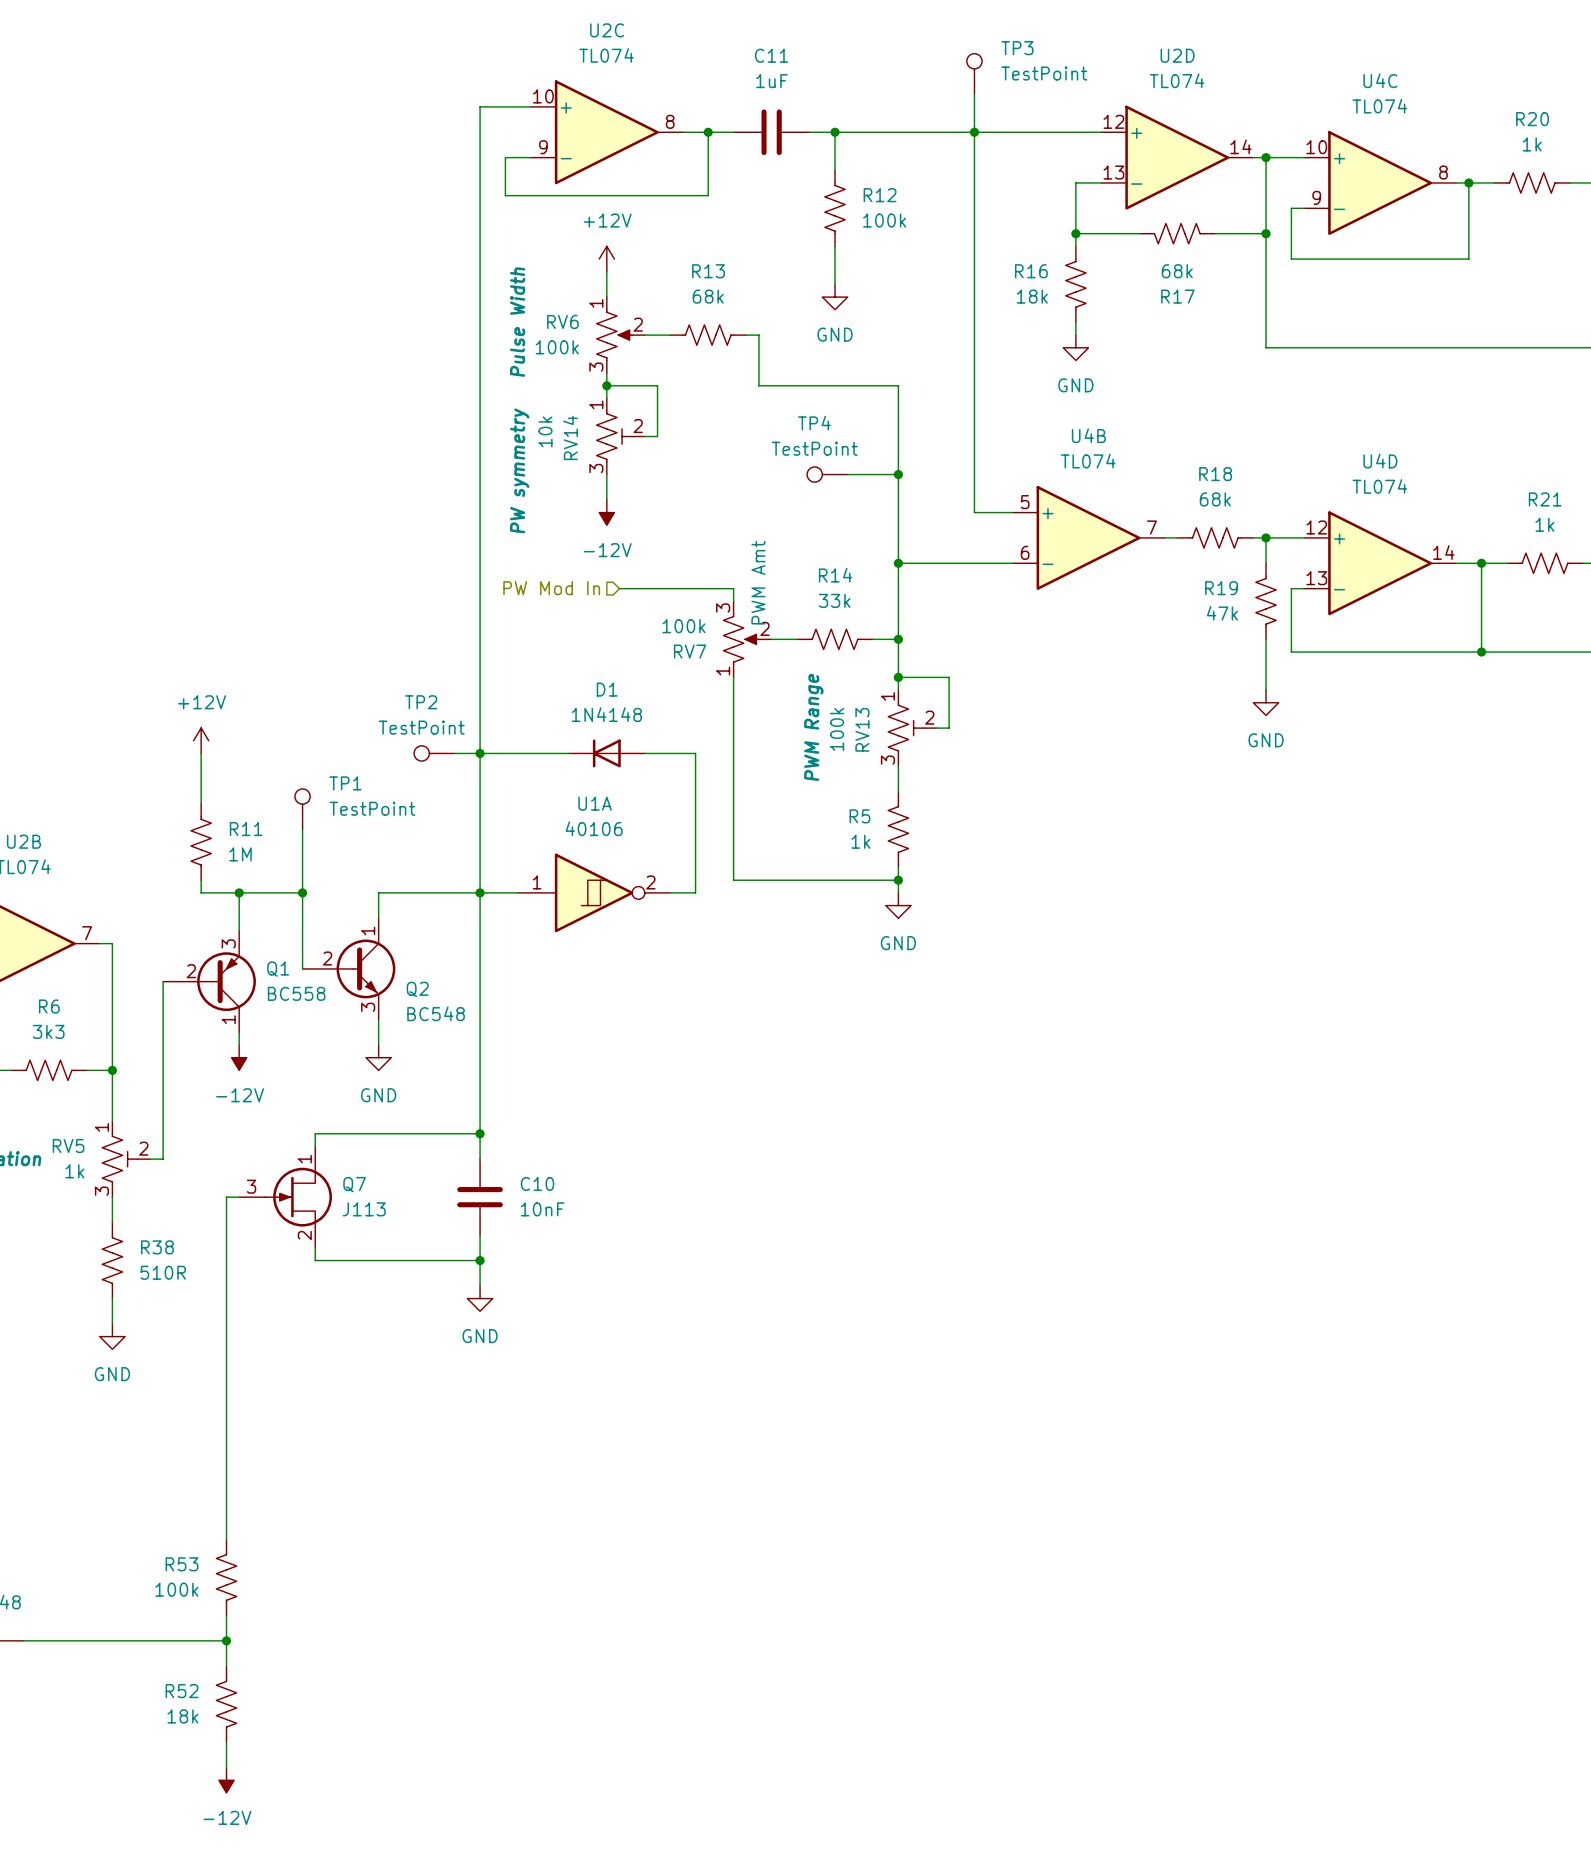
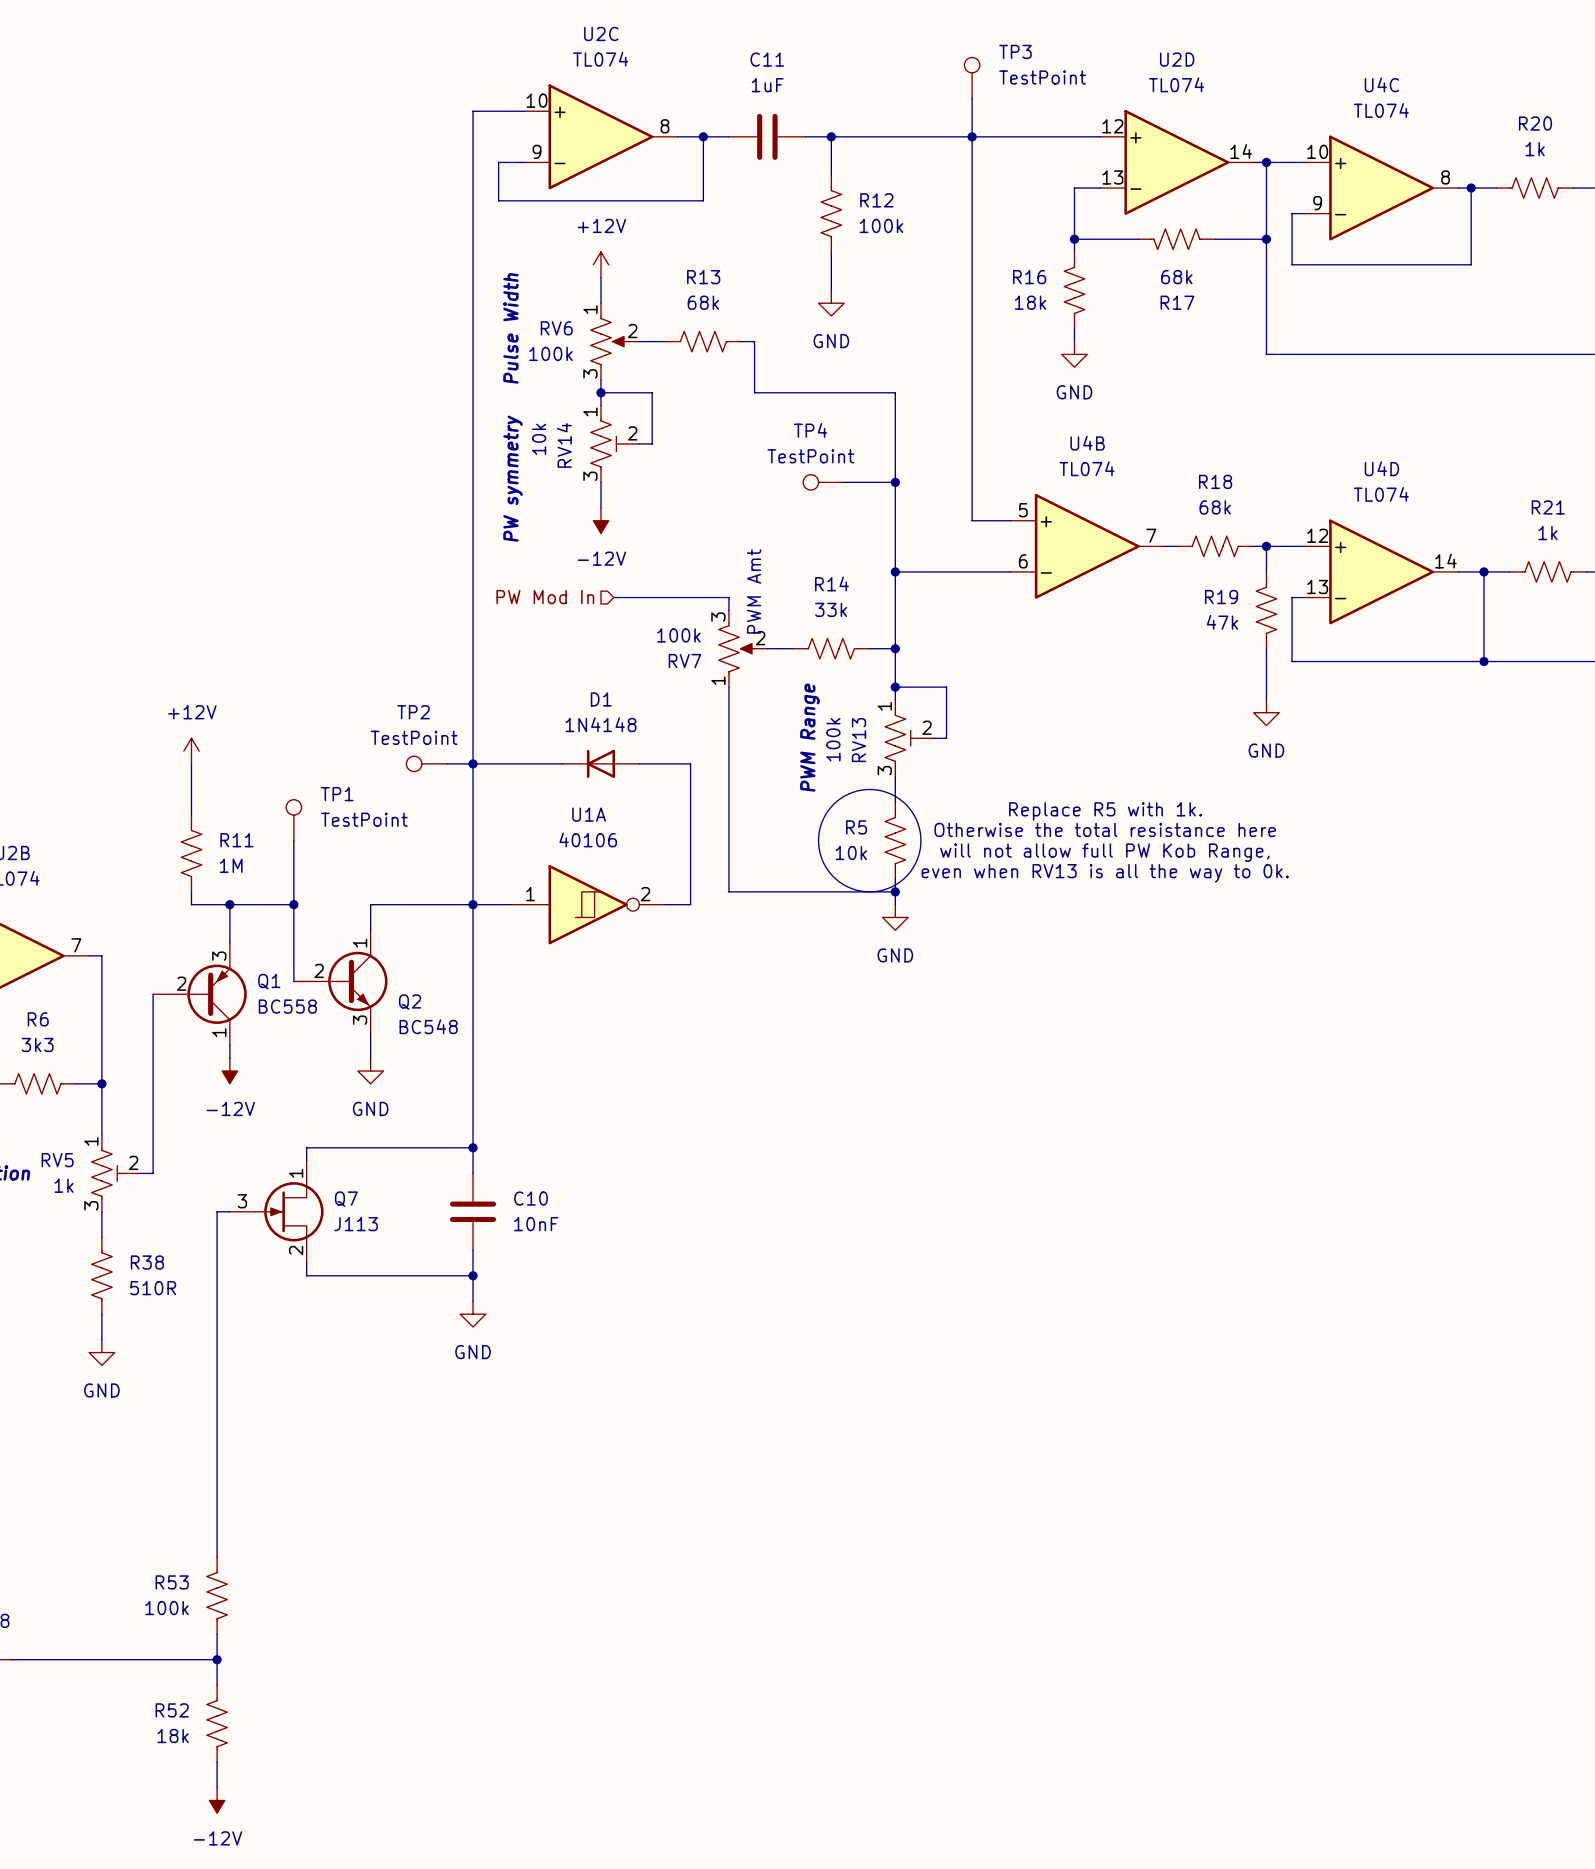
drawing: none -> [818, 789, 921, 892]
text: none -> Replace R5 with 1k. (1105, 811)
text: none -> Otherwise the total resistance here (1105, 829)
R5 value: 1k (860, 841) -> 10k (851, 853)
text: none -> will not allow full PW Kob Range, (1104, 852)
text: none -> even when RV13 is all the way to 0k. (1105, 873)

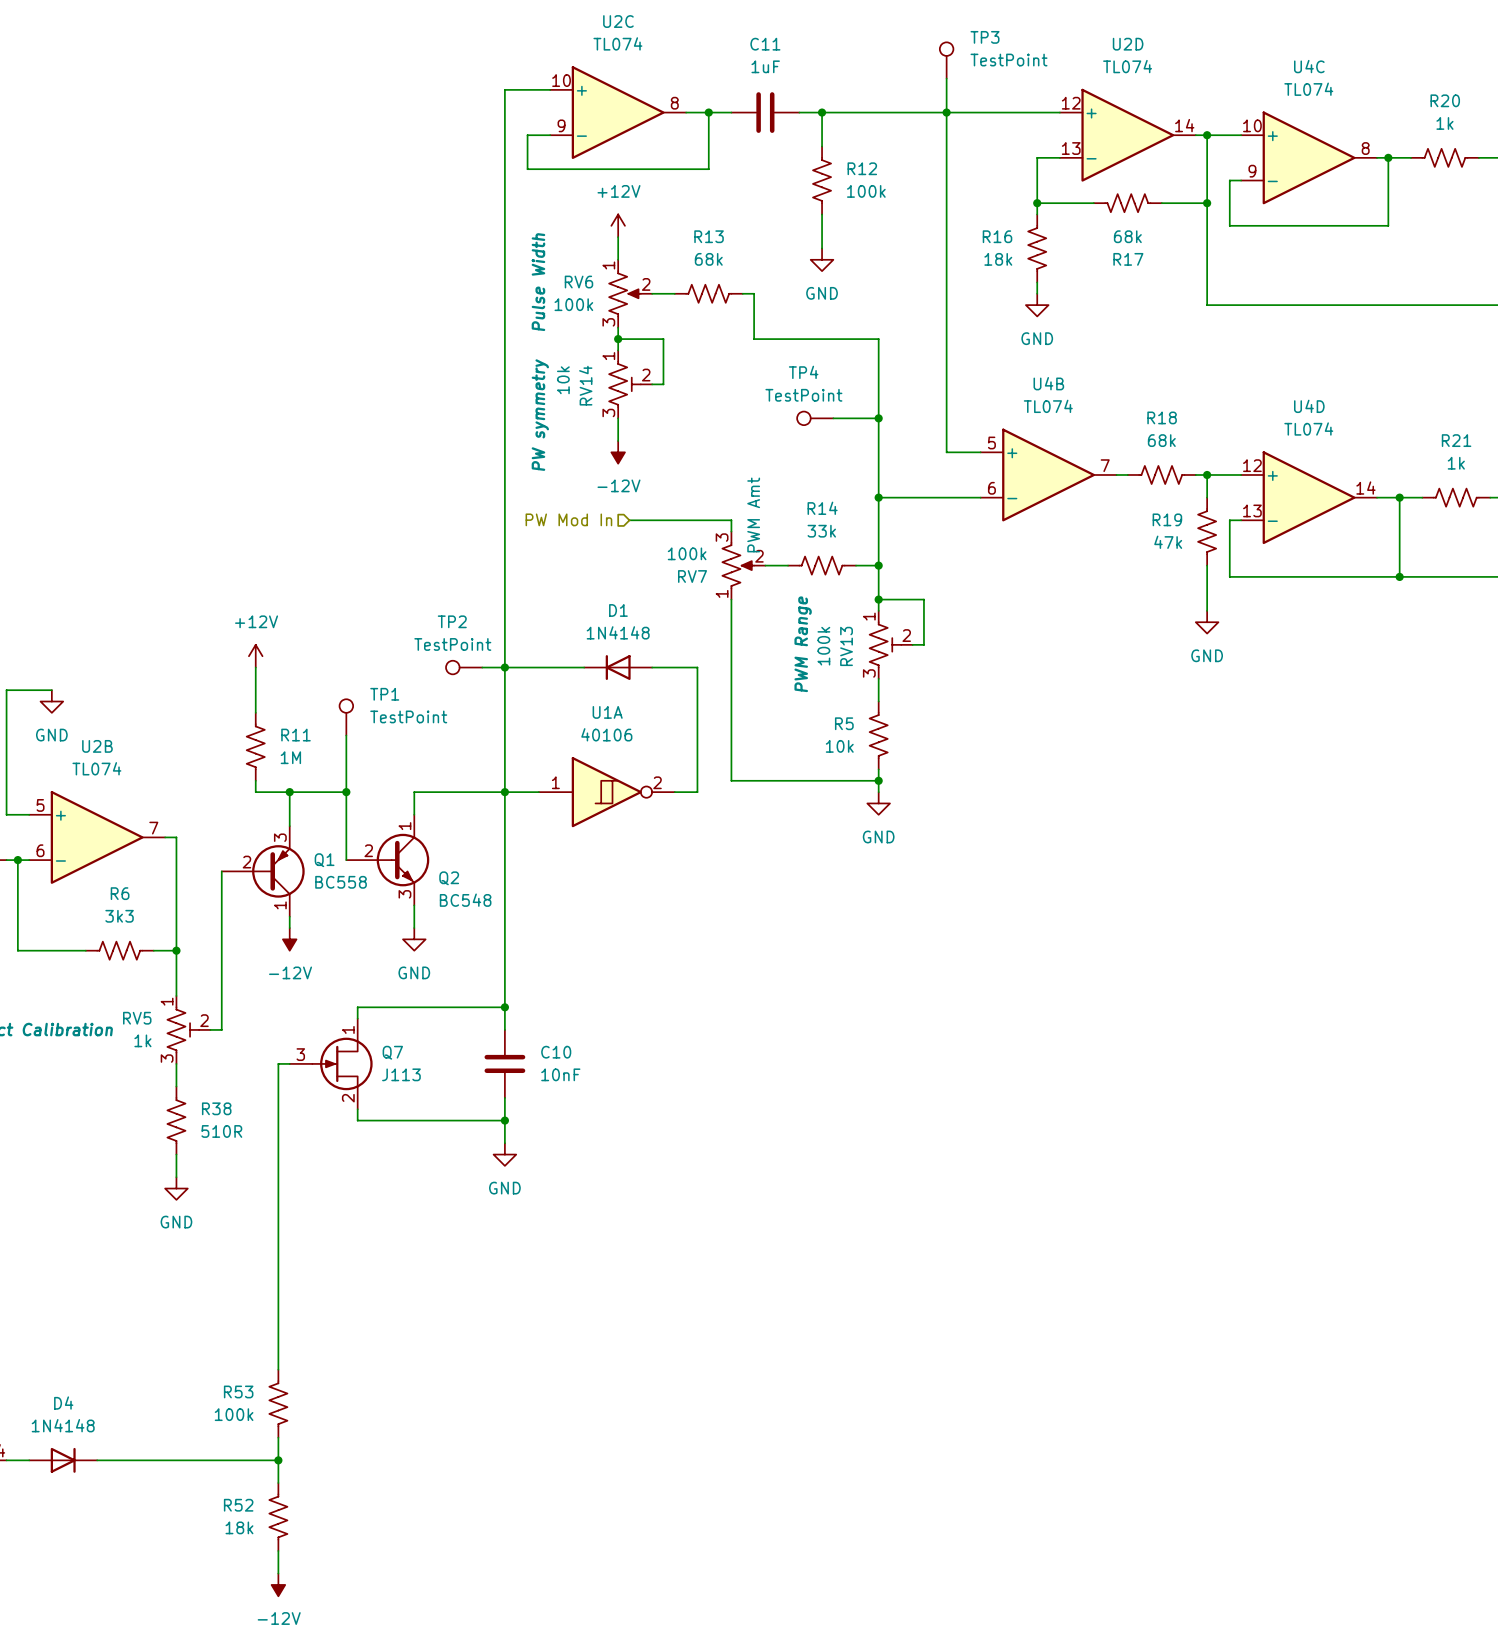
drawing: [818, 789, 921, 892] -> none
text: Replace R5 with 1k. (1105, 811) -> none
text: Otherwise the total resistance here (1105, 829) -> none
text: will not allow full PW Kob Range, (1104, 852) -> none
text: even when RV13 is all the way to 0k. (1105, 873) -> none

